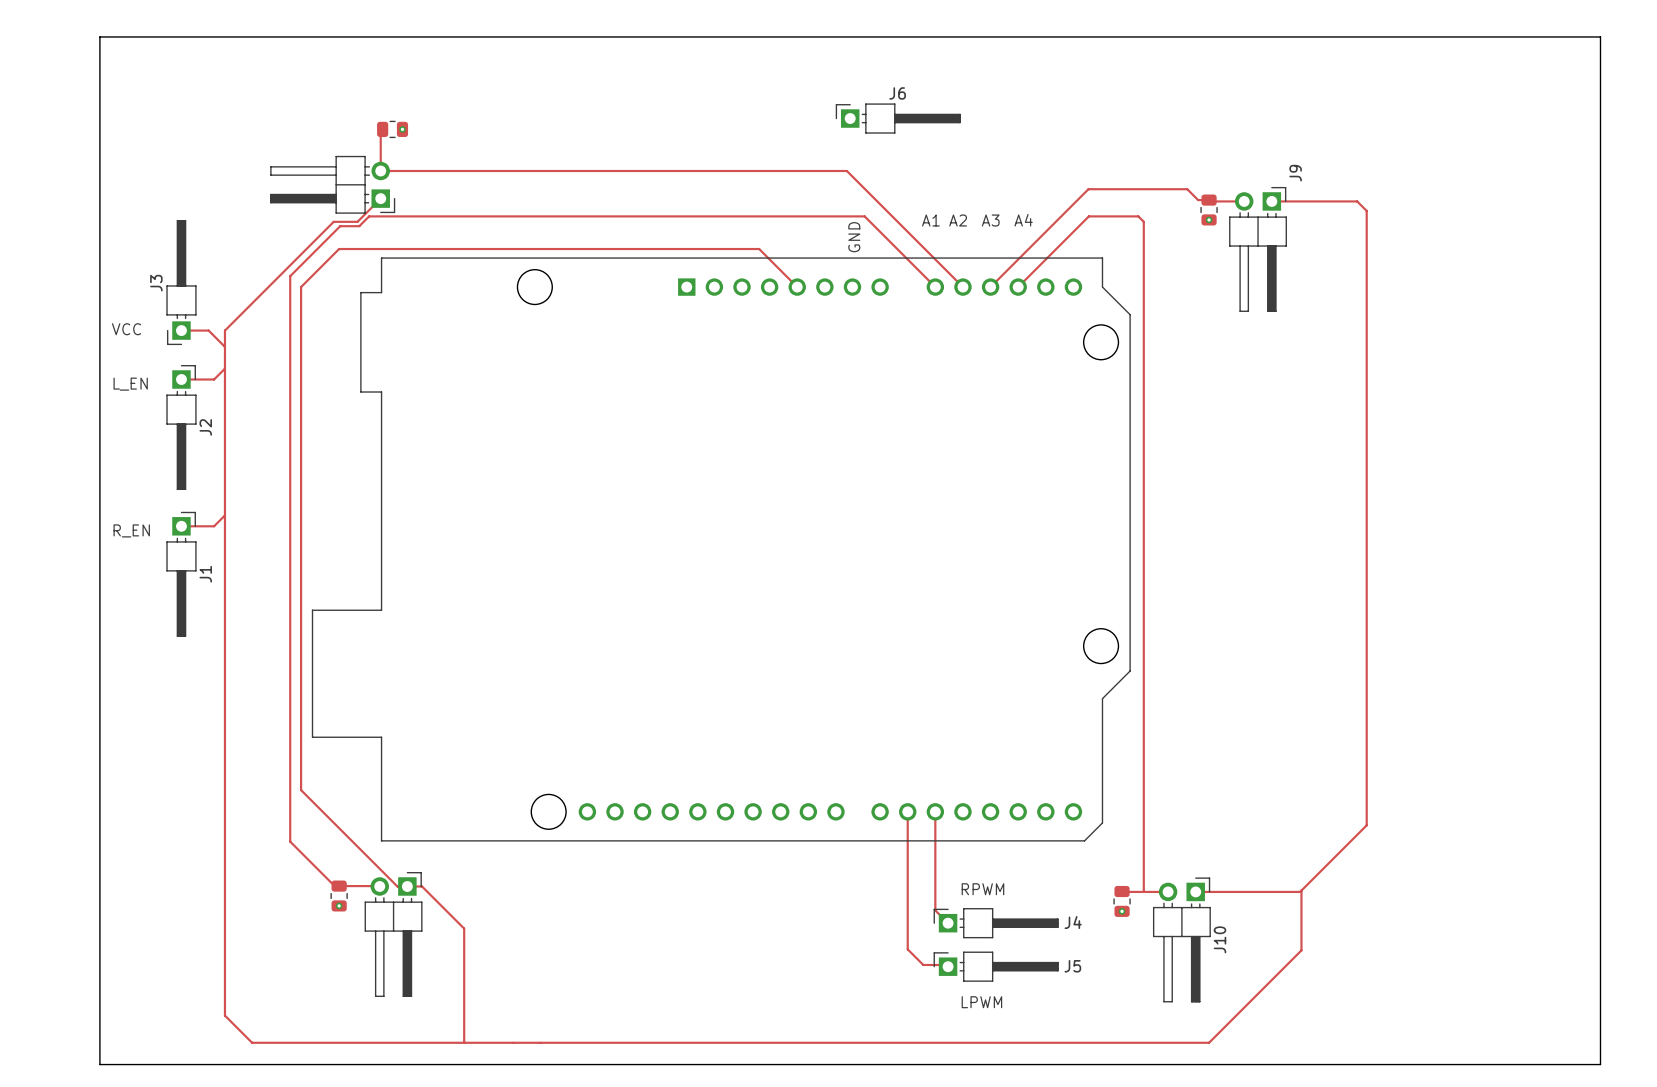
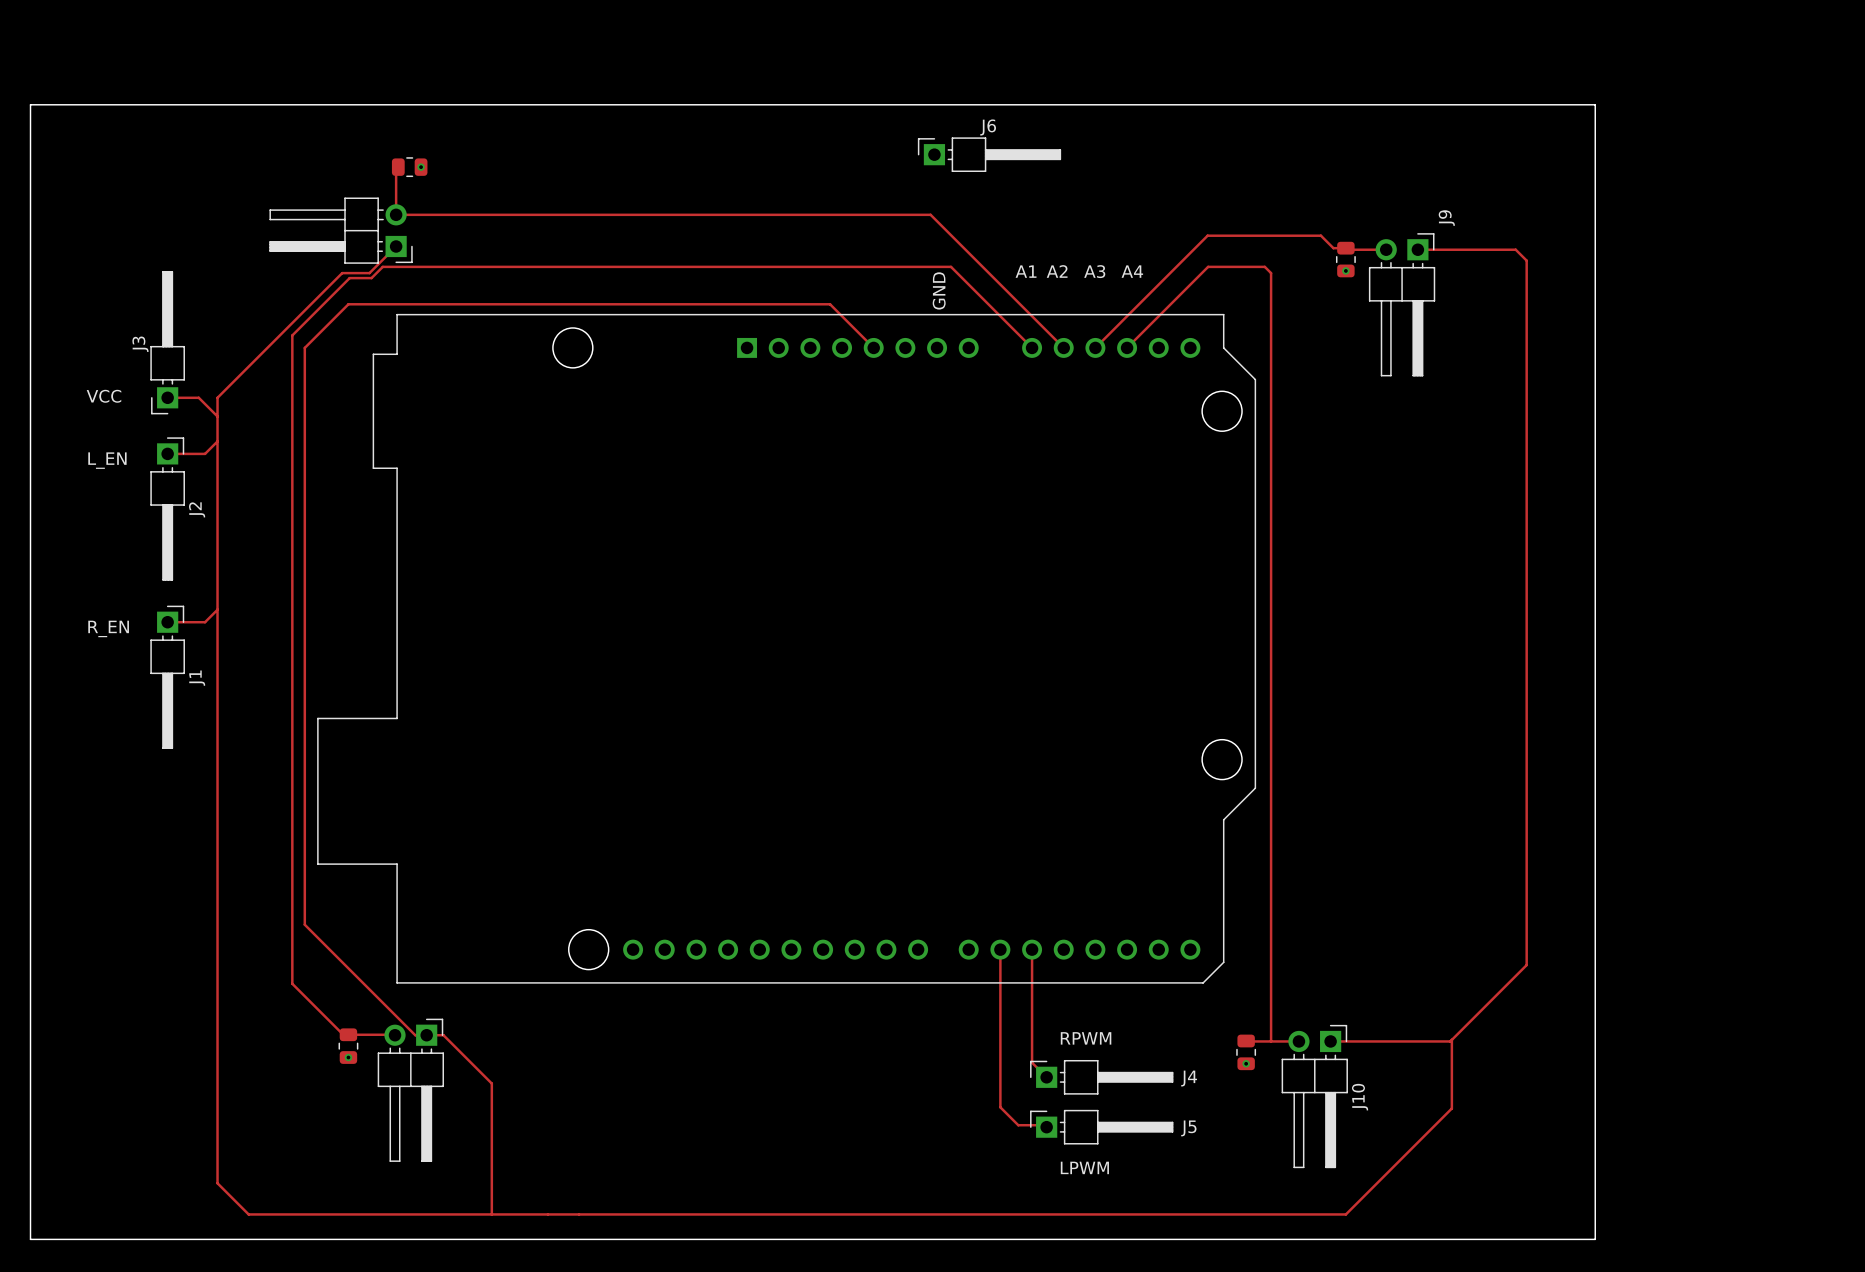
board edge: (99, 1064) (99, 36) (1600, 36) (1600, 1064) (1426, 1064) -> (74, 1239) (30, 1239) (30, 104) (1595, 104) (1595, 1239)

